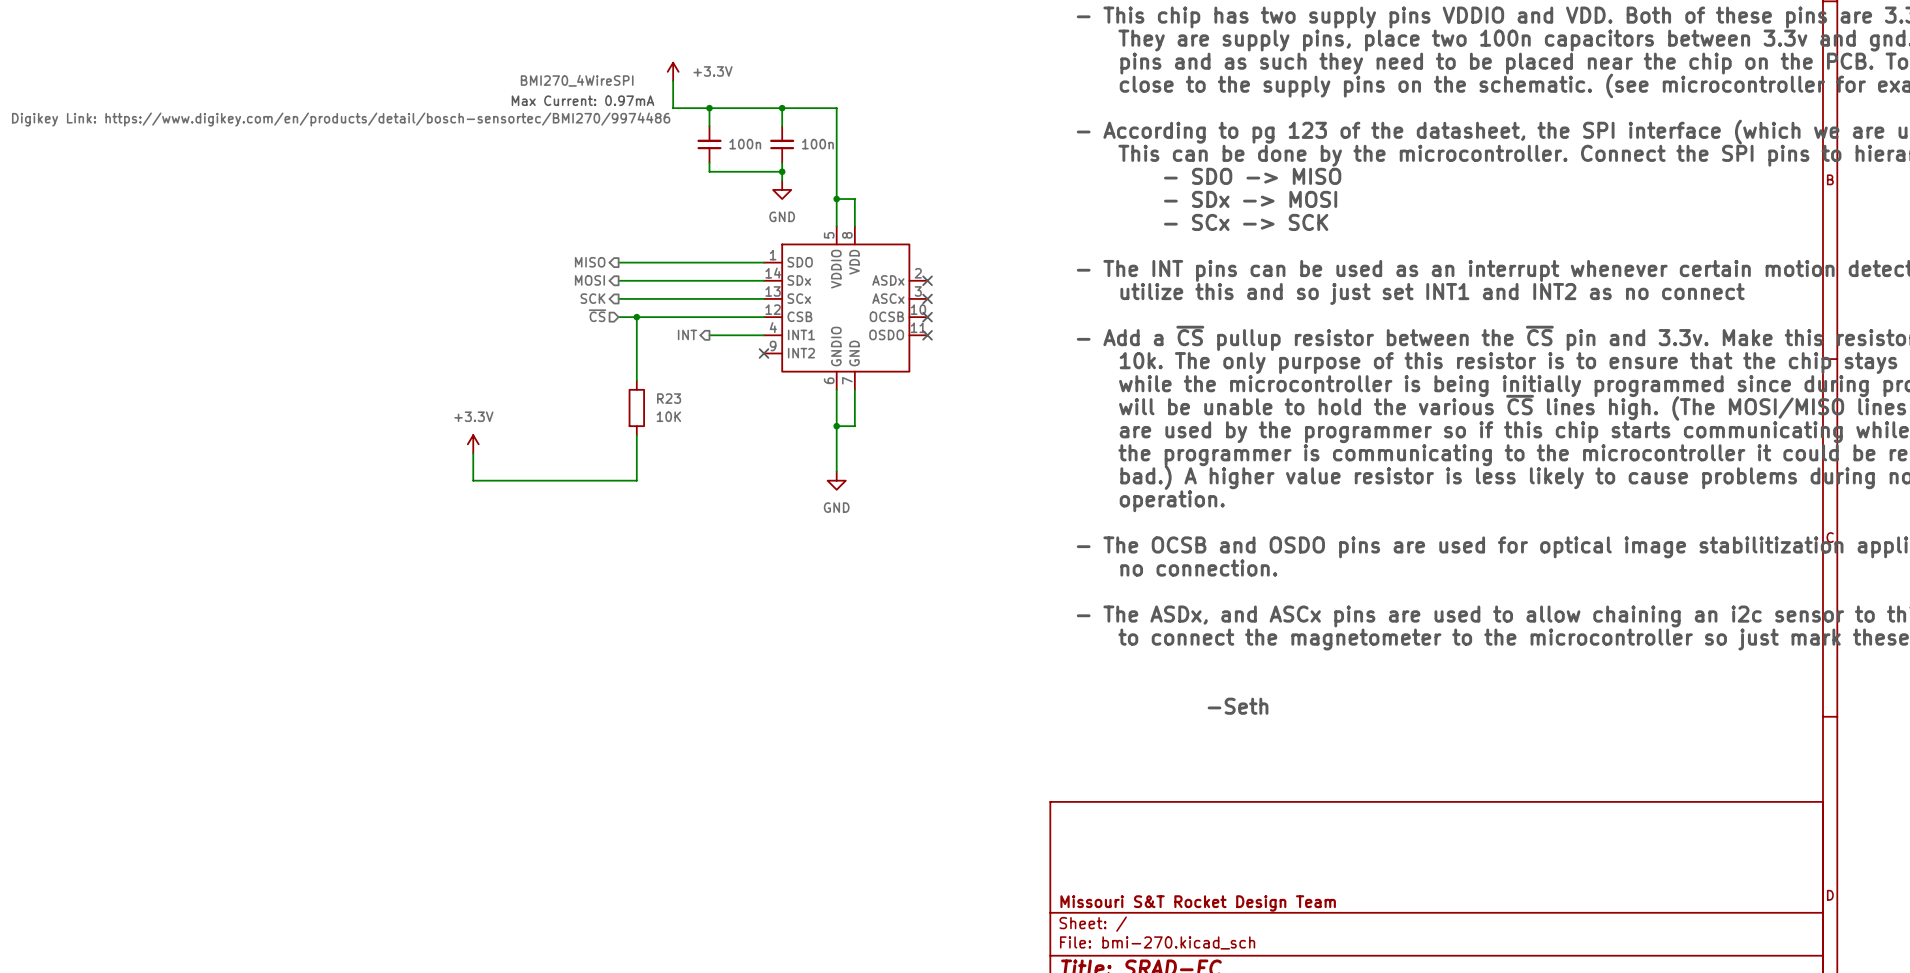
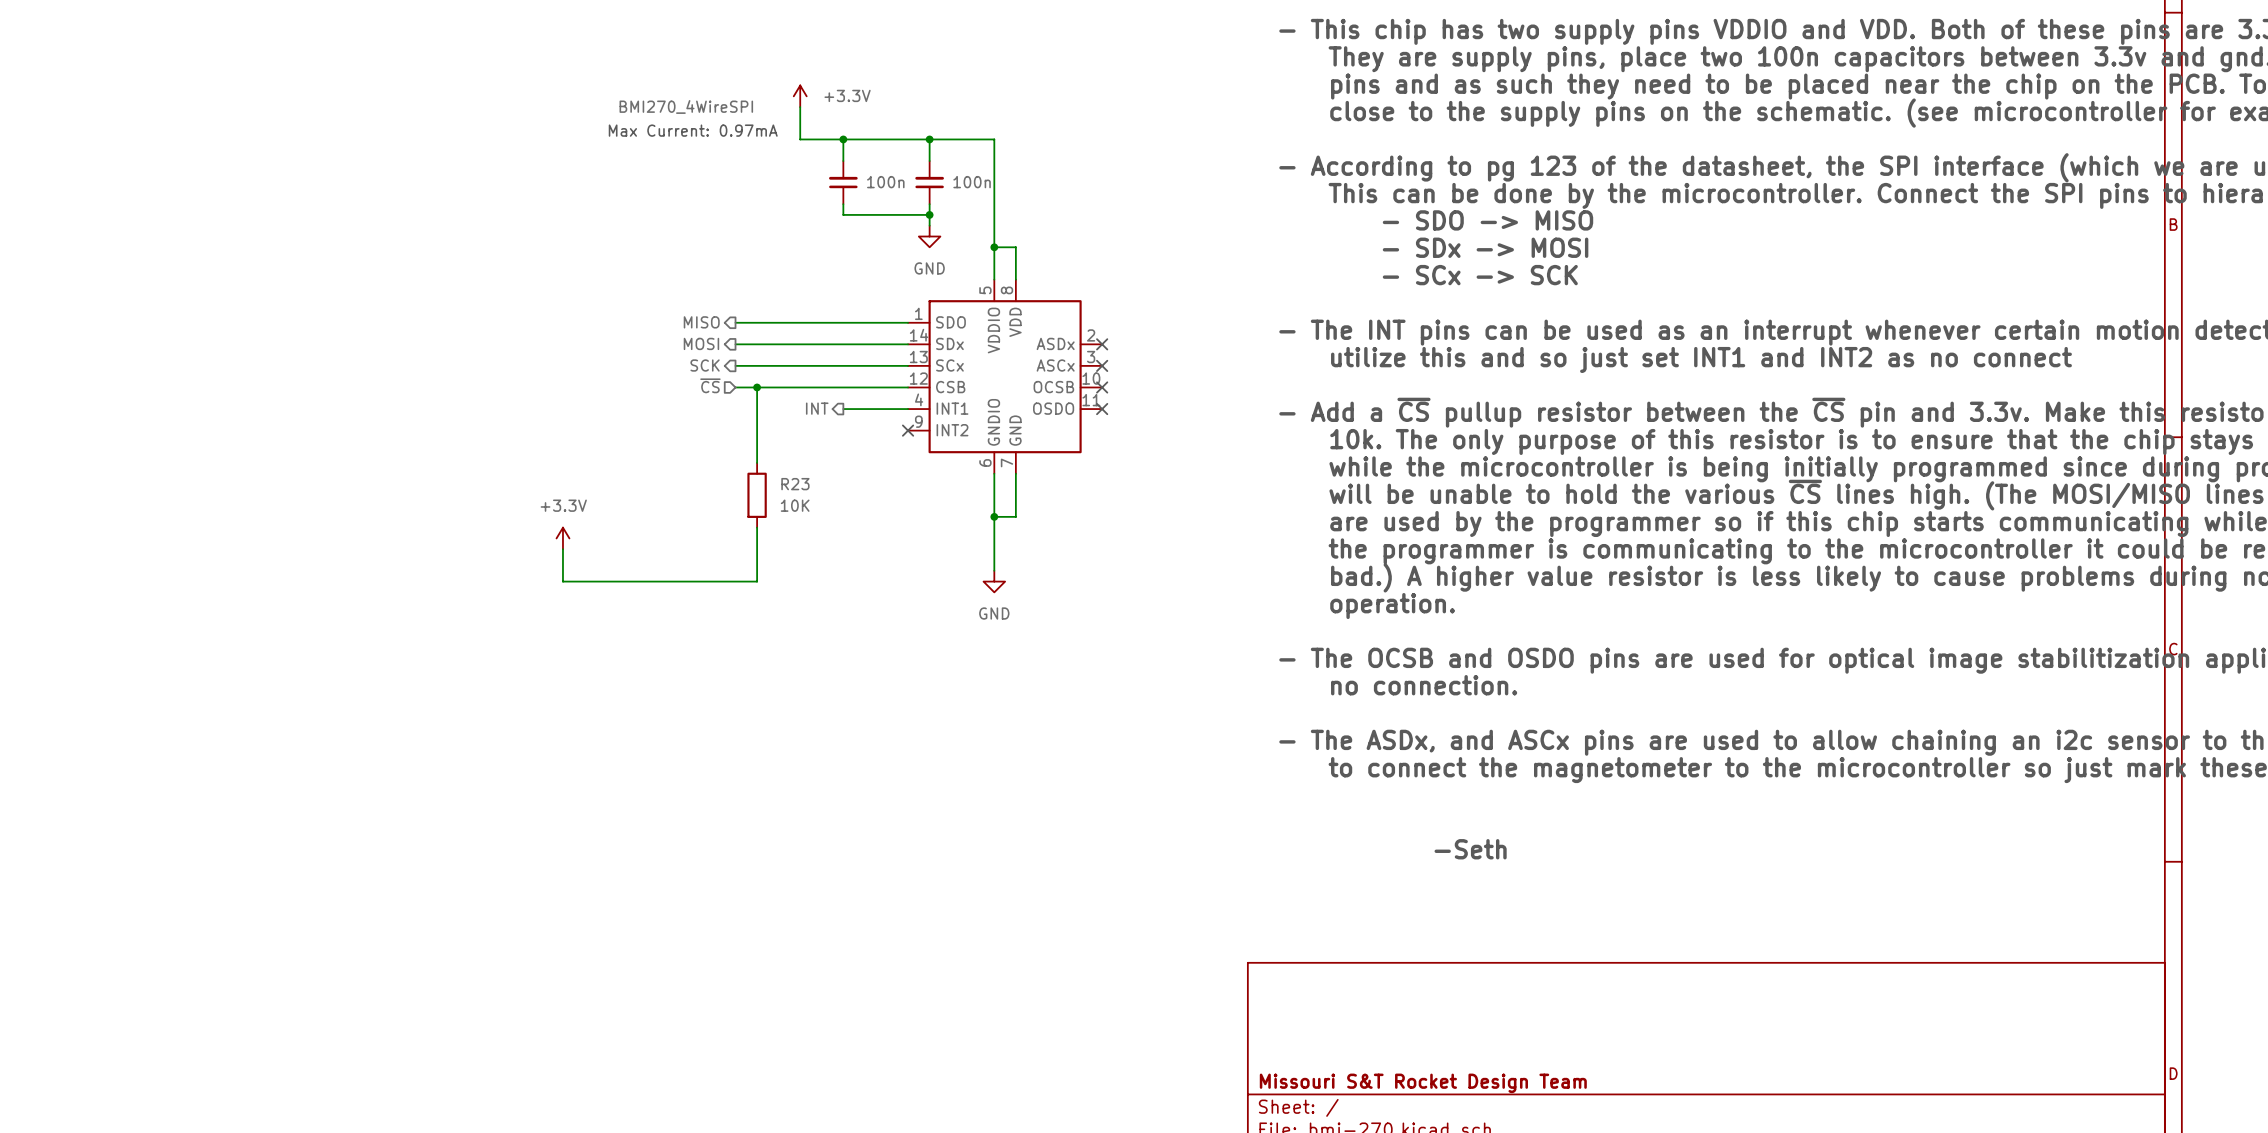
label: Digikey Link: https://www.digikey.com/en/products/detail/bosch-sensortec/BMI270/9974486 (341, 119) -> none

